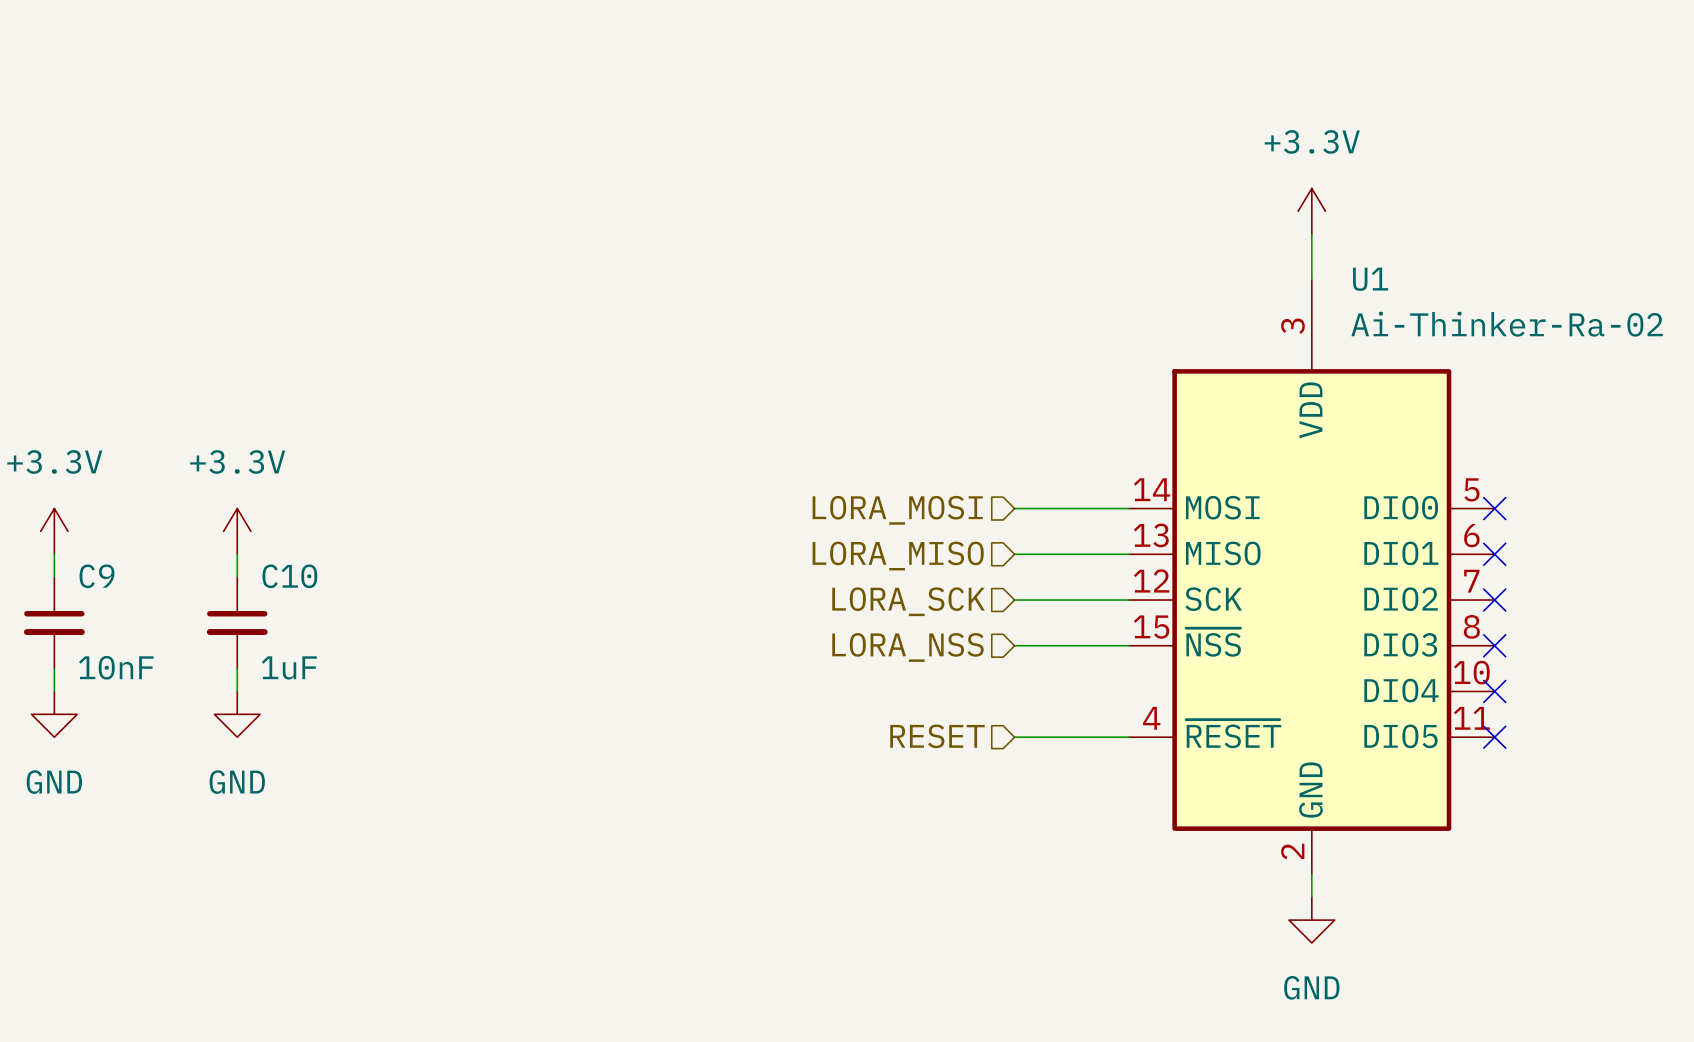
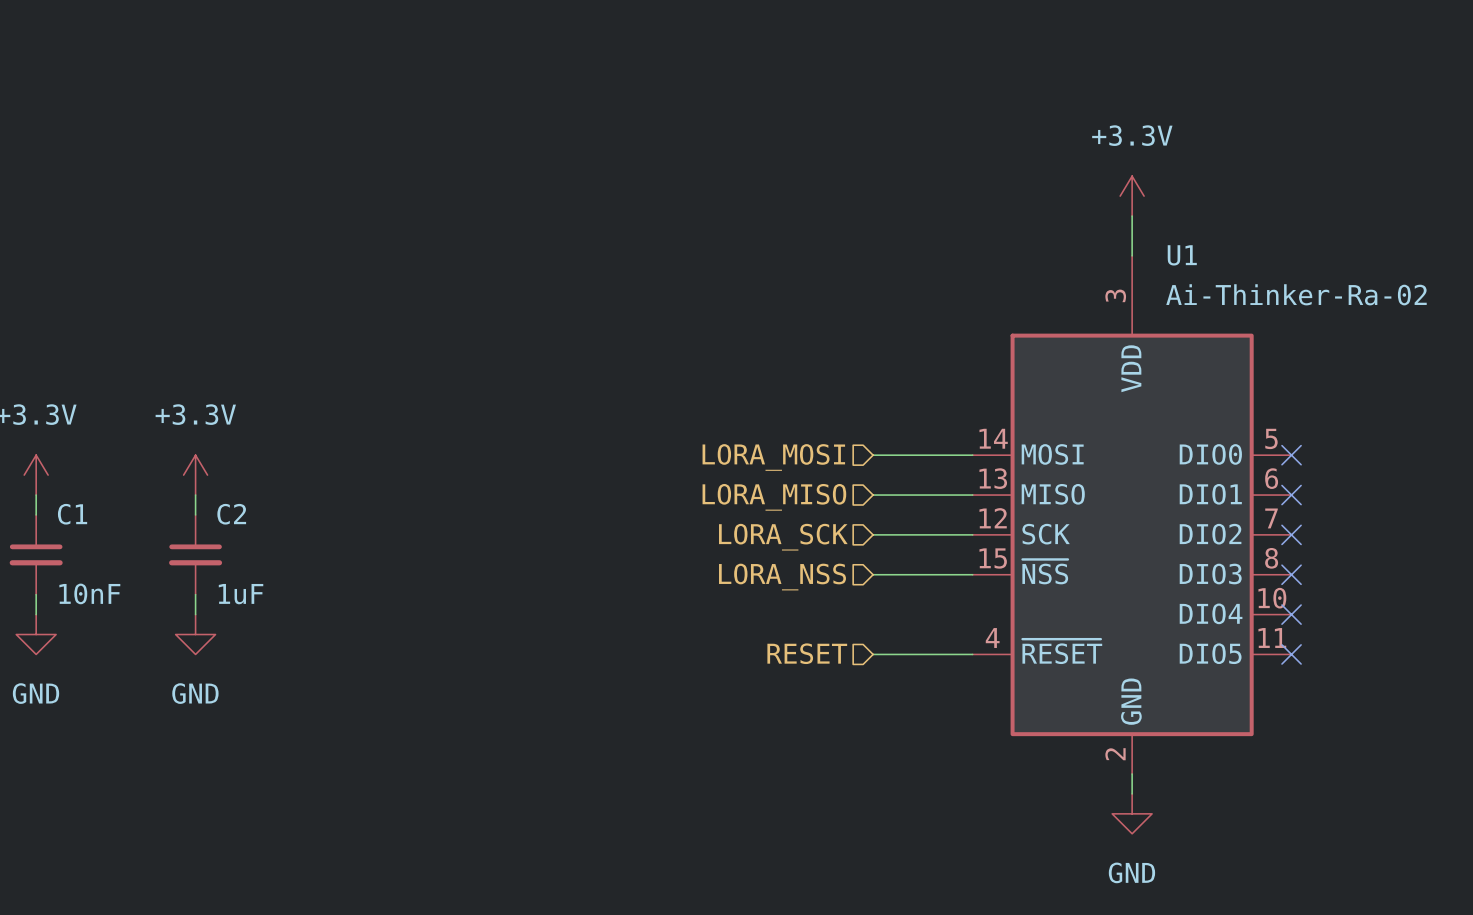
C9 name: C9 (96, 576) -> C1 (72, 514)
C10 name: C10 (289, 576) -> C2 (231, 514)

